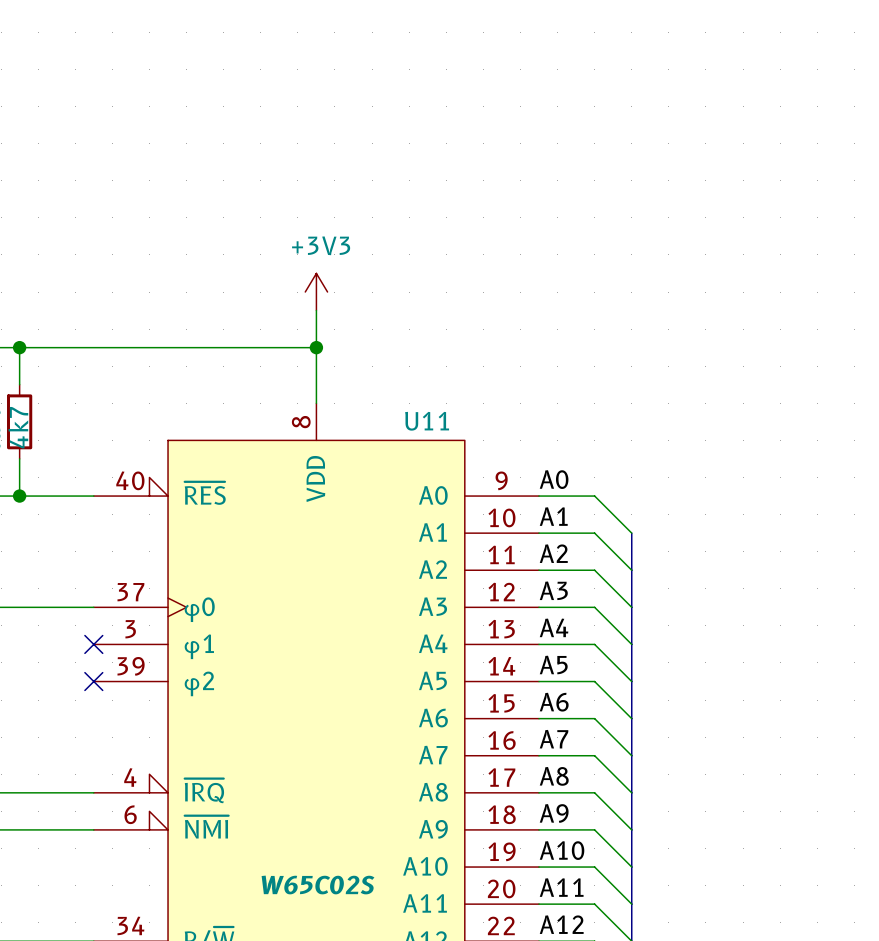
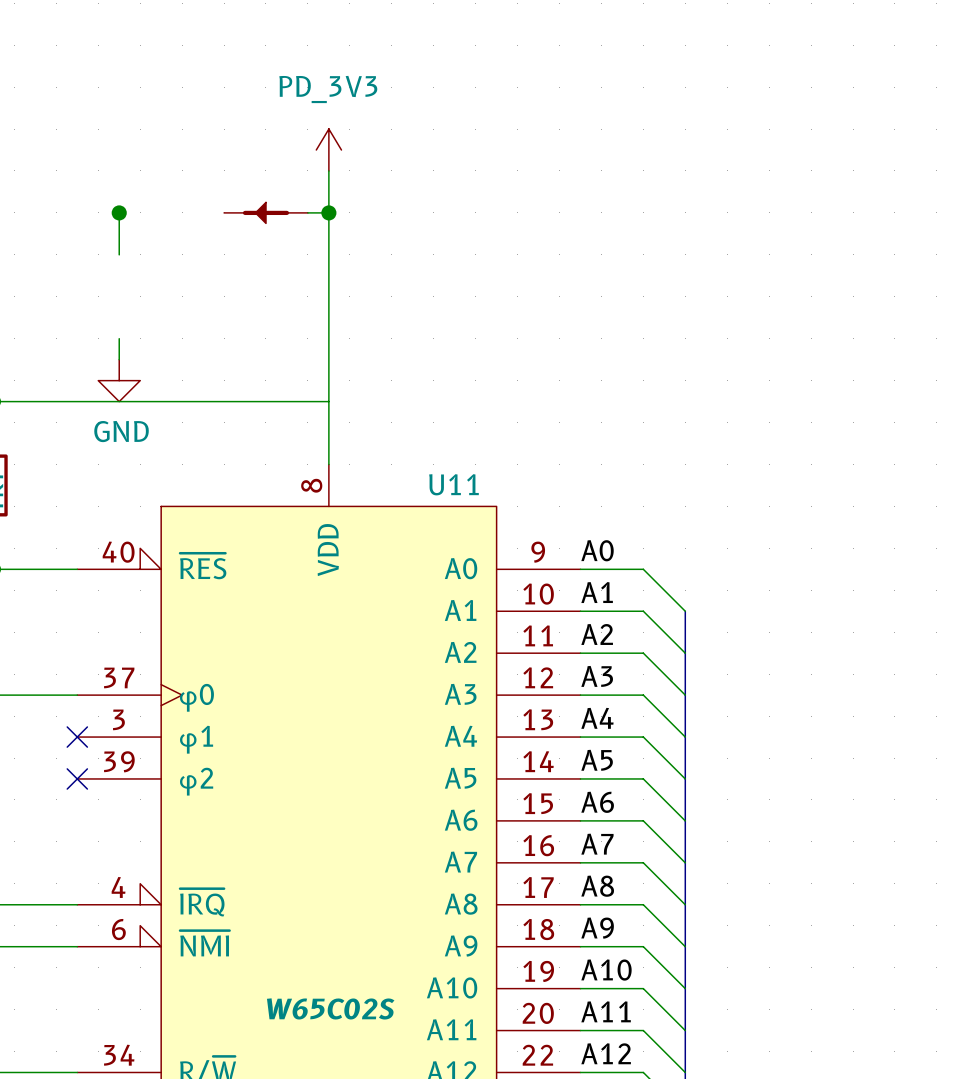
power symbol: none -> PD_3V3 (328, 150)
wire: none -> (328, 170) (328, 359)
wire: none -> (119, 212) (119, 254)
junction: none -> (119, 212)
part: none -> (265, 212)
wire: none -> (307, 212) (328, 212)
junction: none -> (328, 212)
wire: none -> (119, 338) (119, 359)
power symbol: +3V3 (316, 292) -> none
power symbol: none -> GND (119, 380)
junction: (316, 347) -> none

